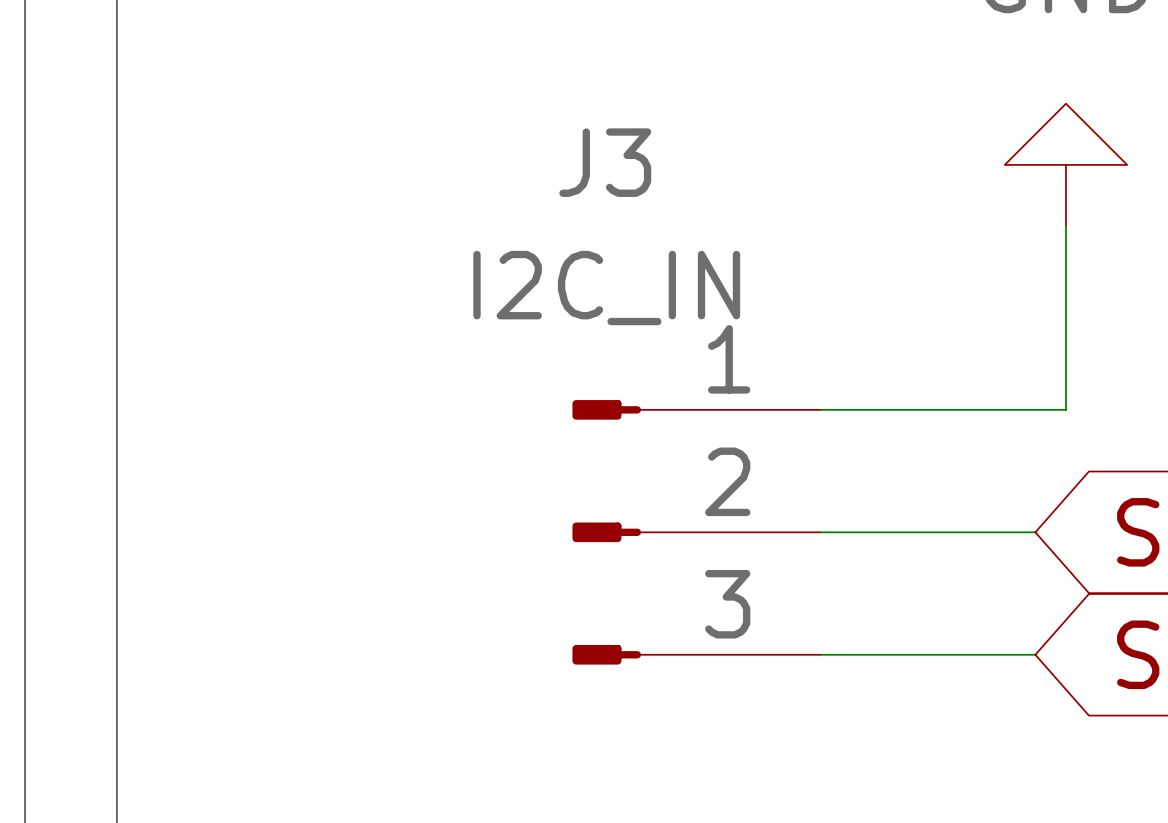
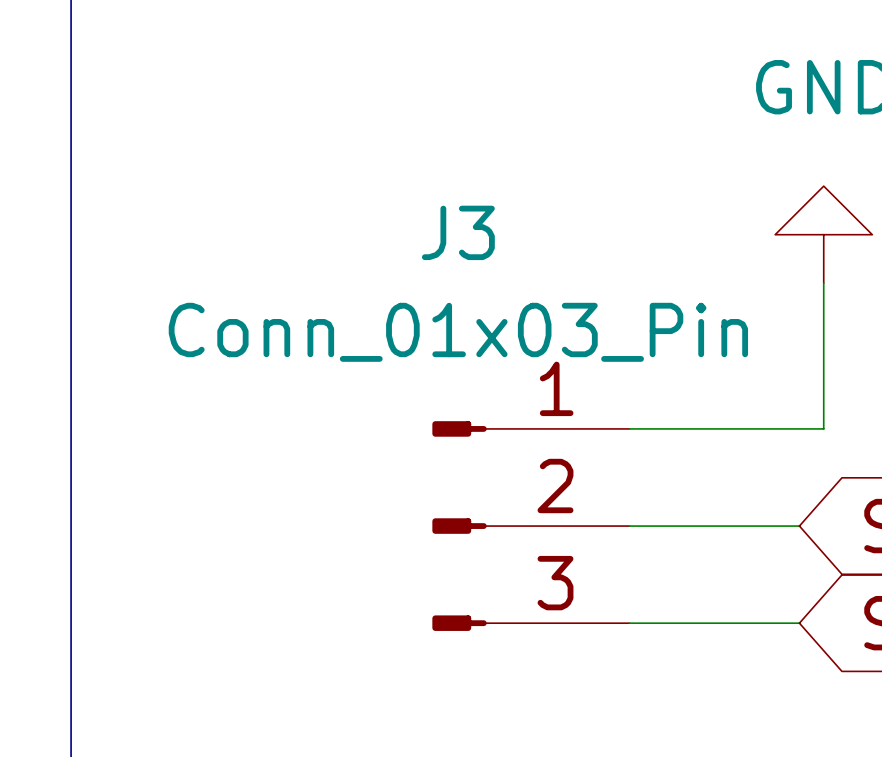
J3 value: I2C_IN (606, 288) -> Conn_01x03_Pin (458, 332)

